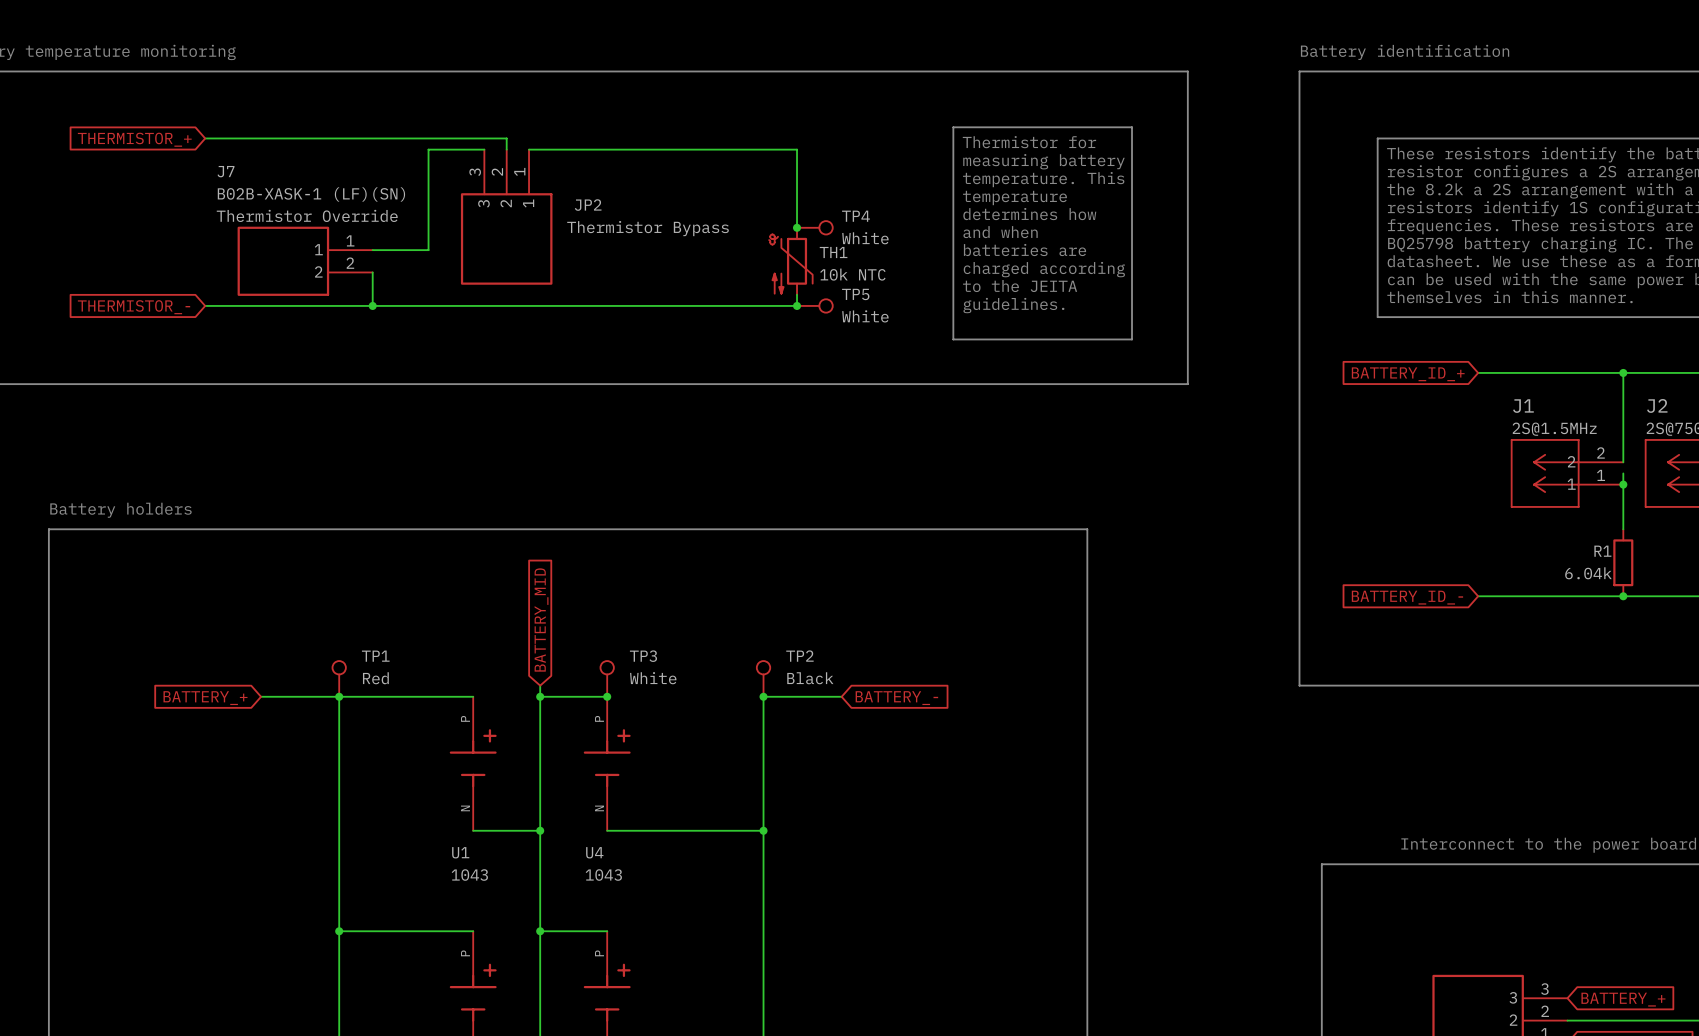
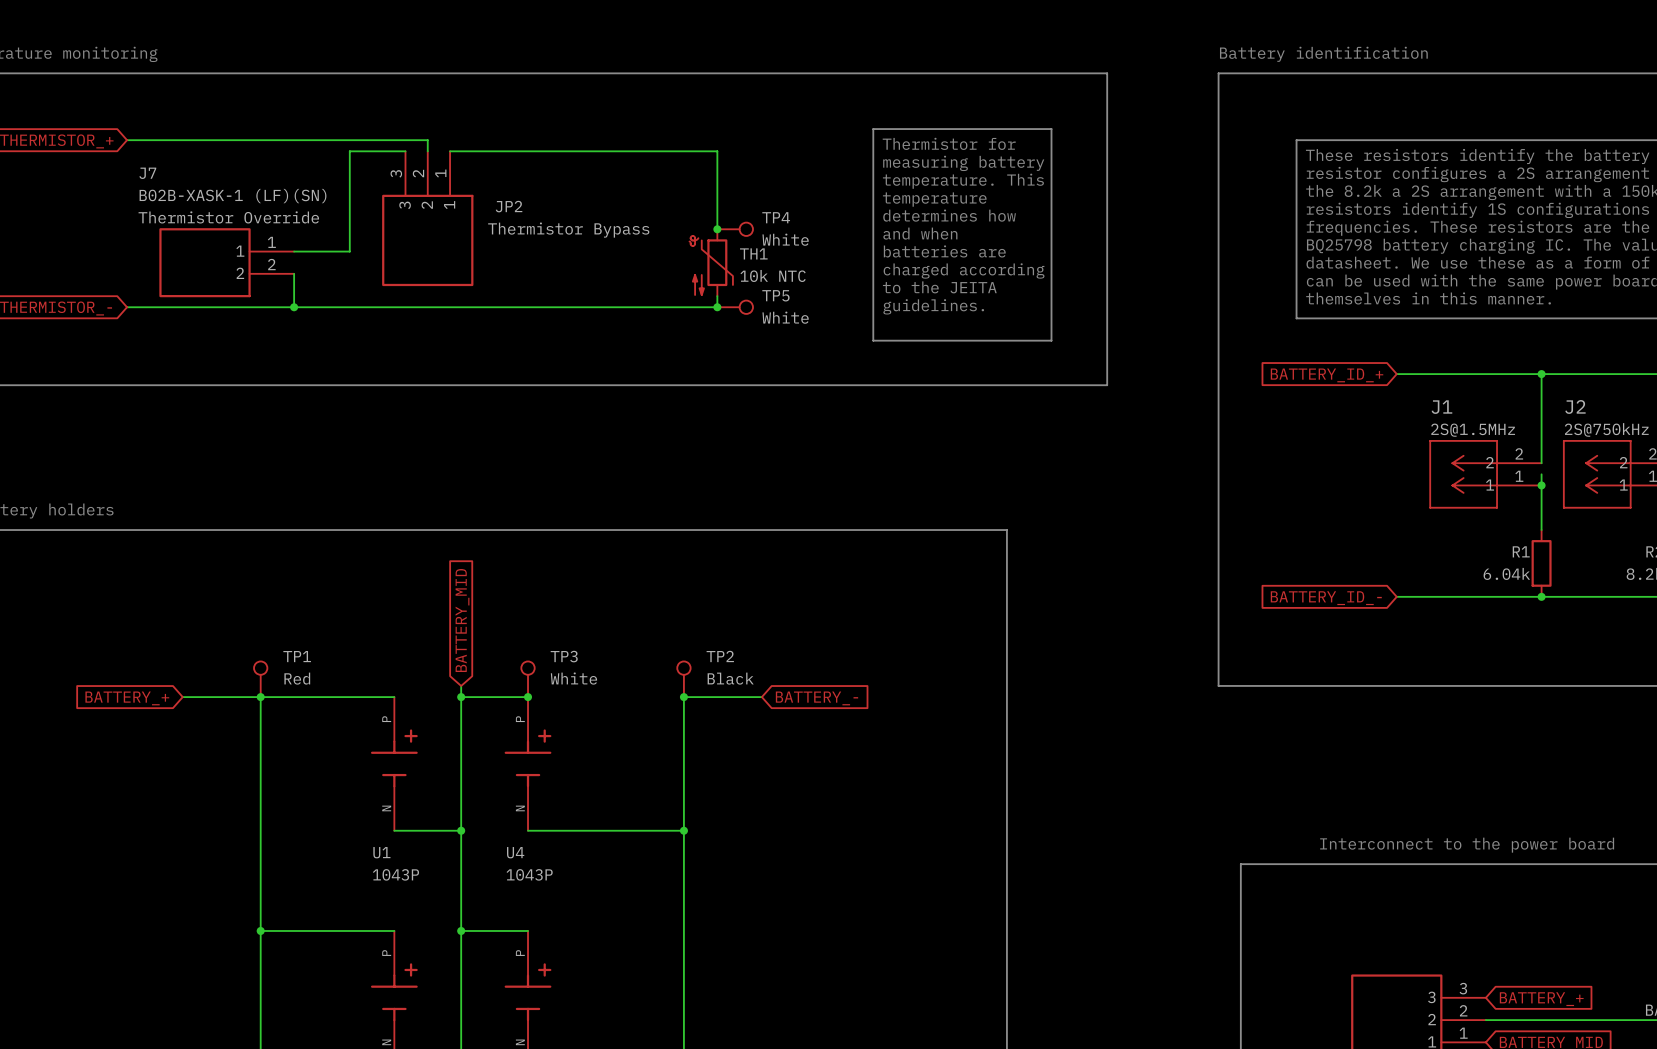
U1 value: 1043 (469, 875) -> 1043P (395, 874)
U4 value: 1043 (603, 875) -> 1043P (529, 874)

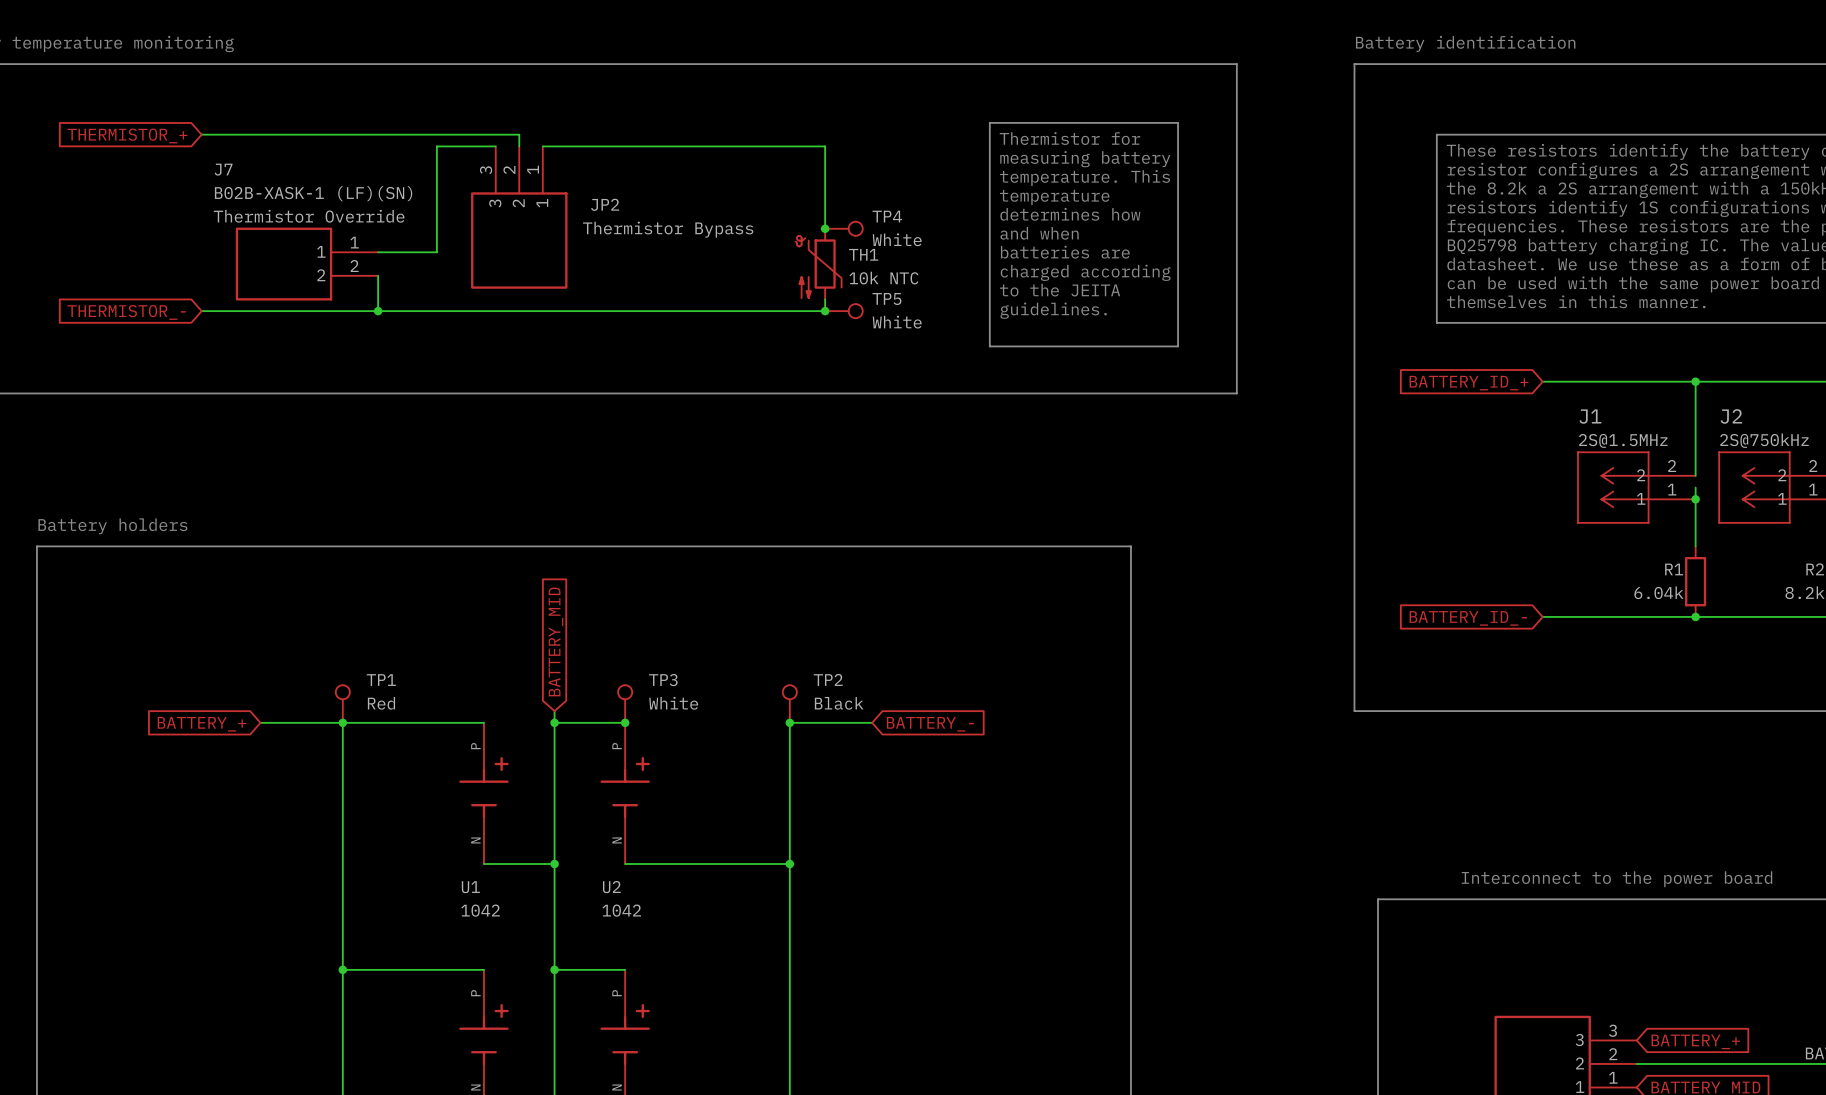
U4 name: U4 (515, 852) -> U2 (611, 887)
U1 value: 1043P (395, 874) -> 1042 (480, 910)
U4 value: 1043P (529, 874) -> 1042 (621, 910)

